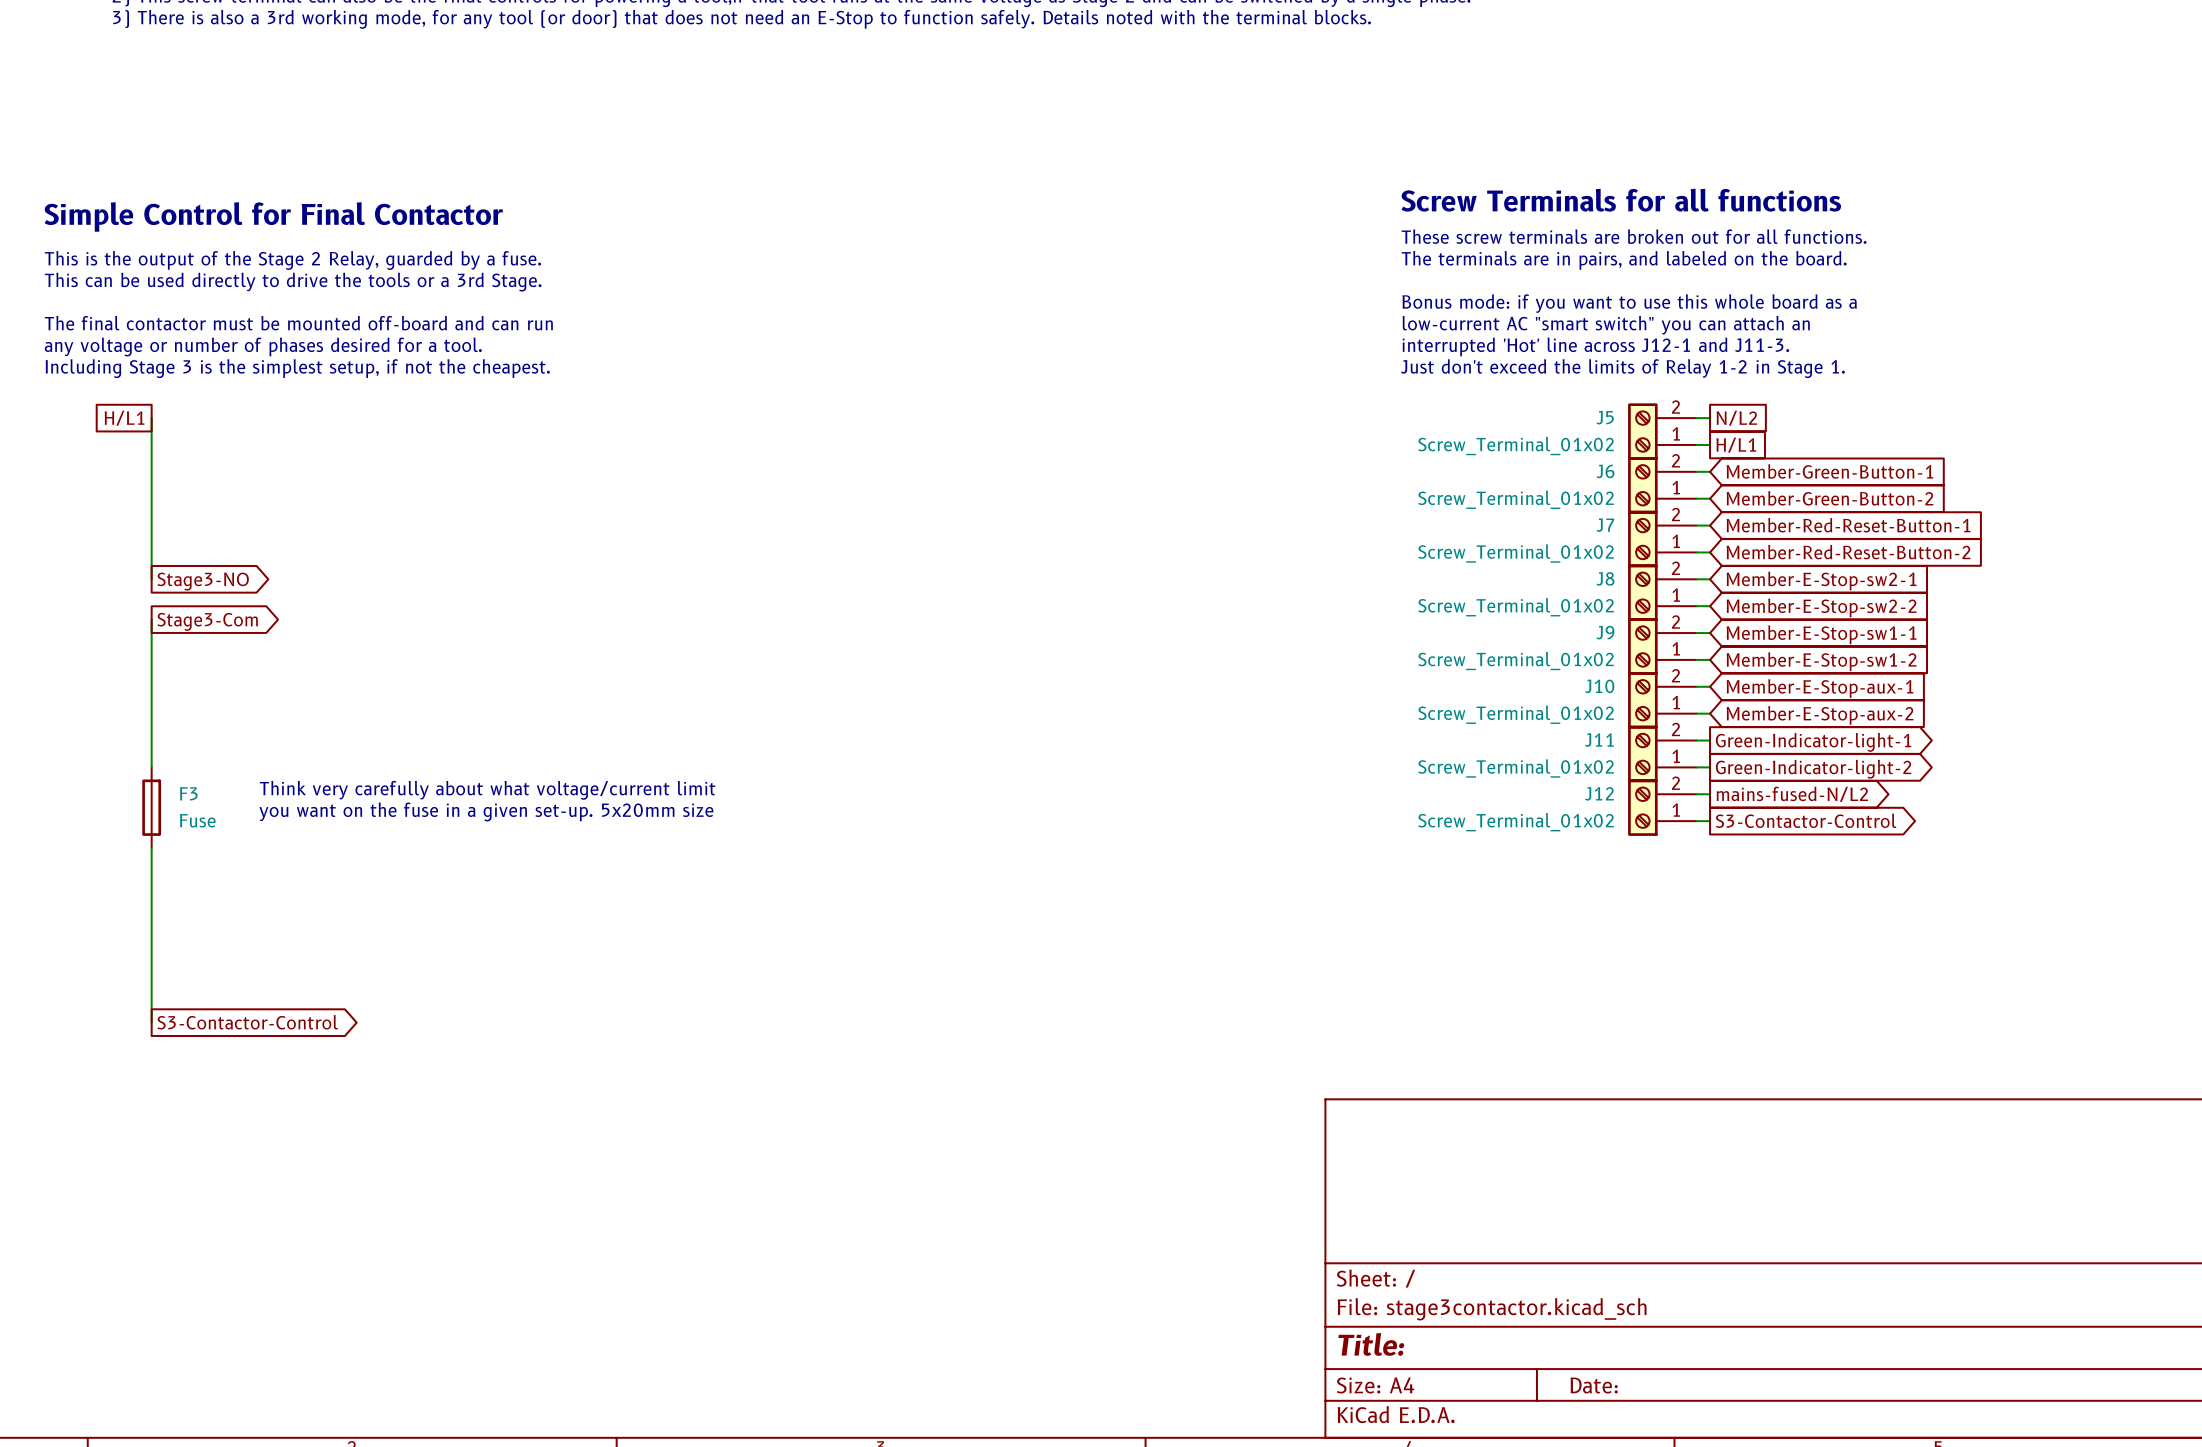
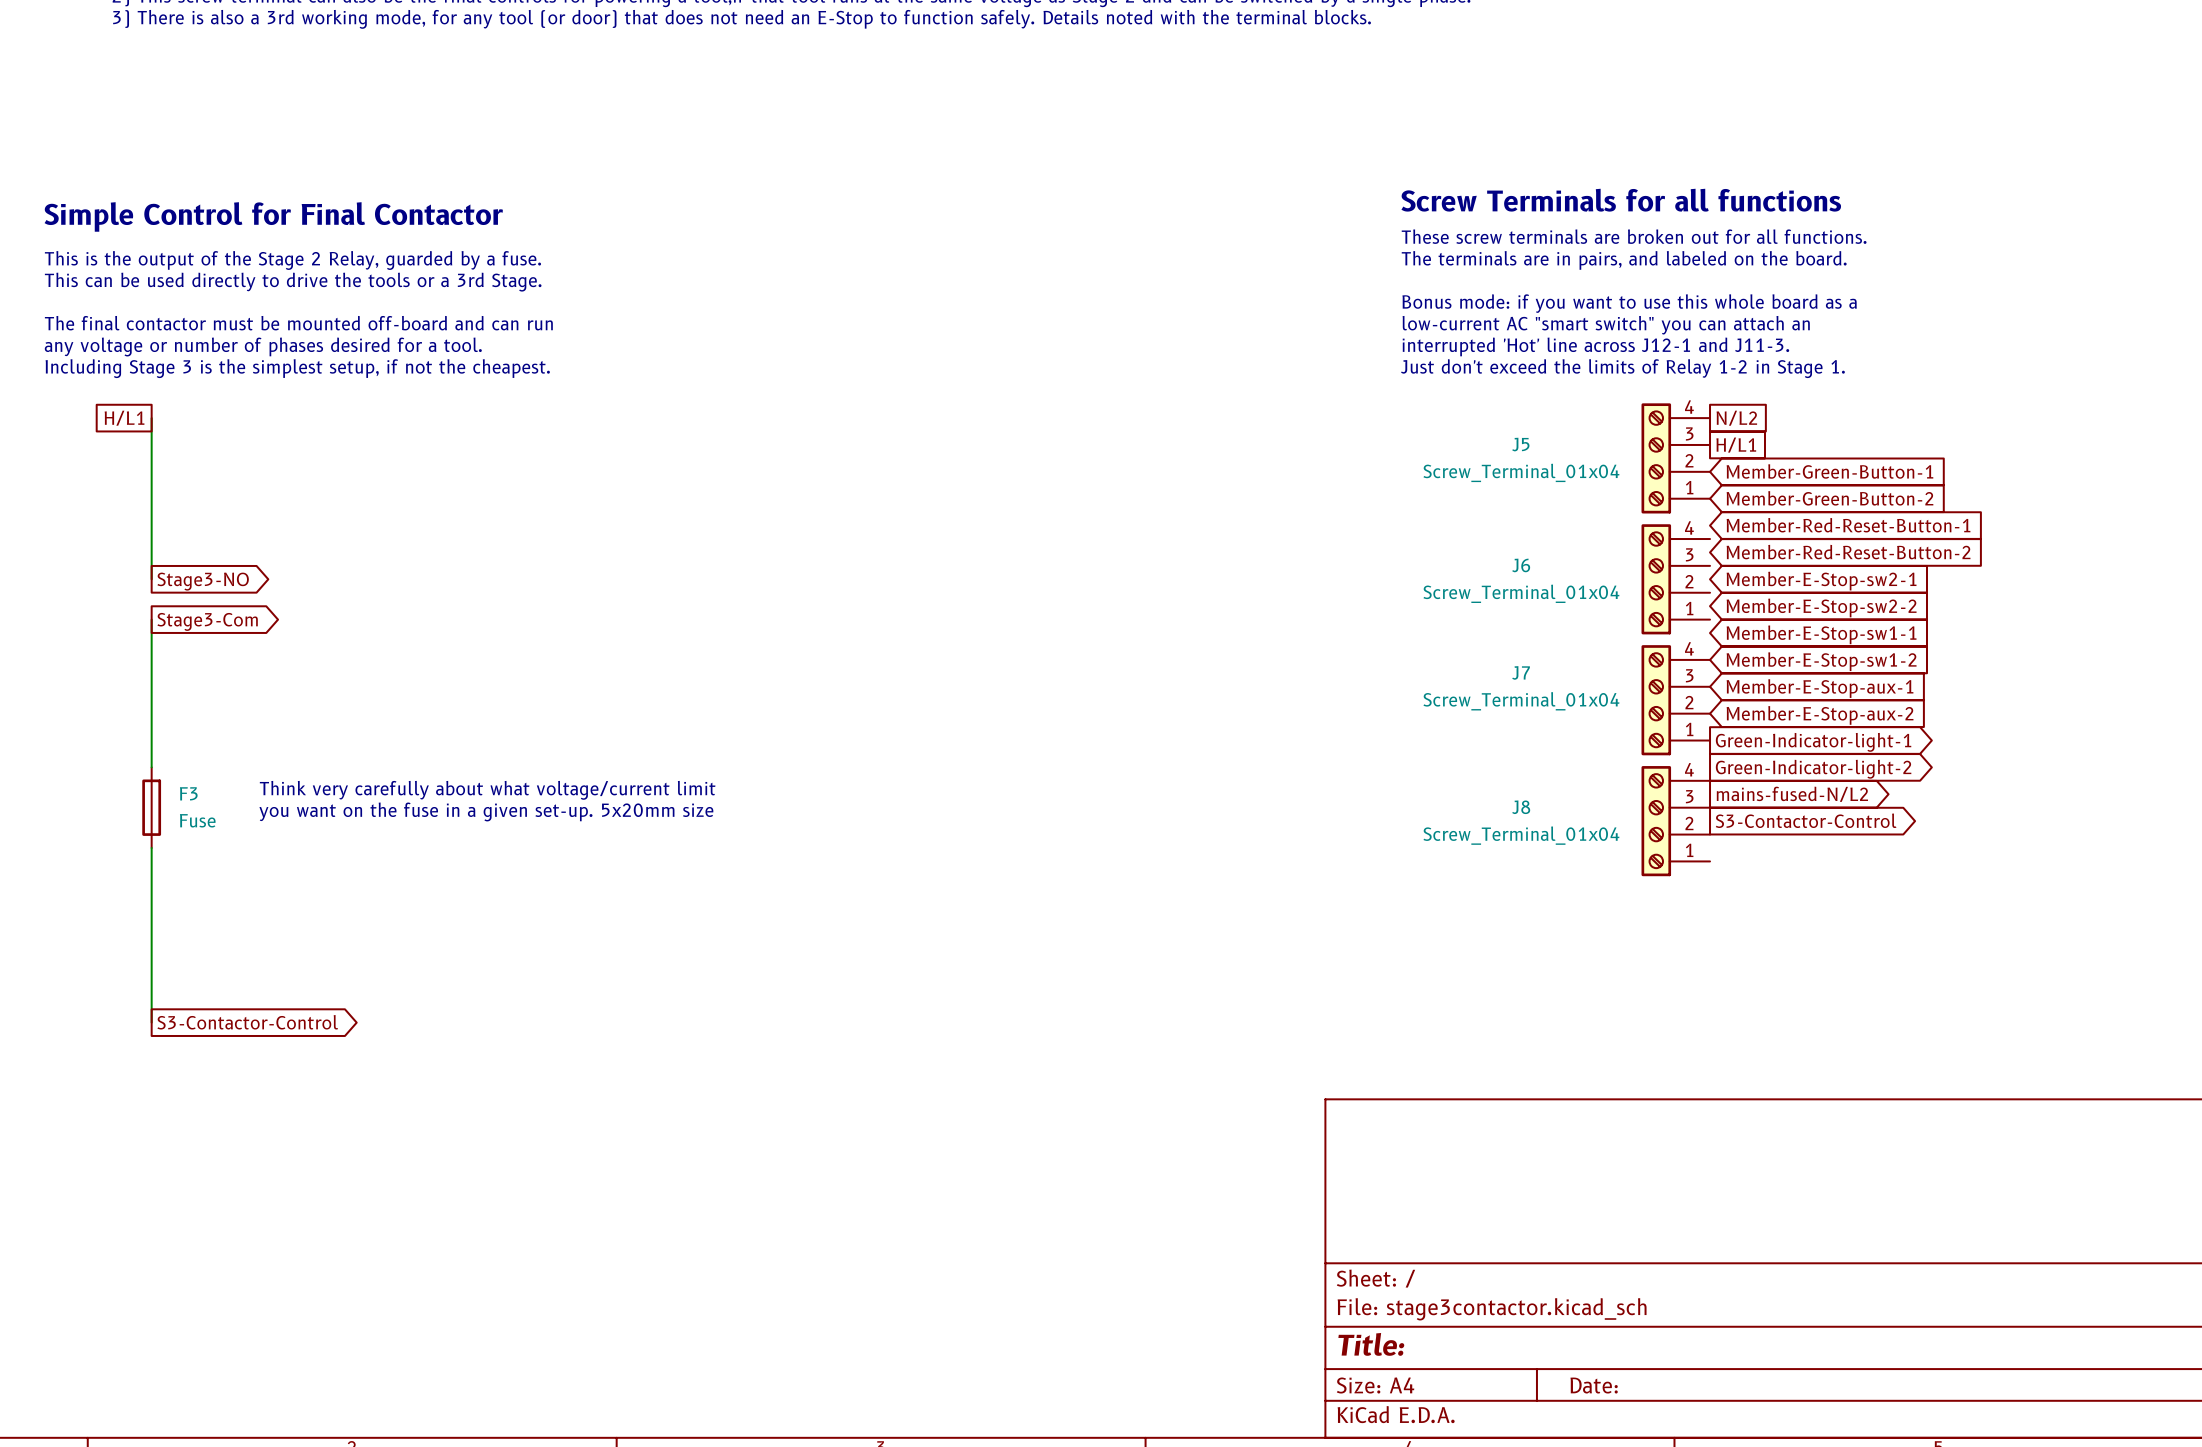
J5 symbol: [1628, 403, 1697, 460] -> [1641, 403, 1711, 514]
J5 name position: J5 (1605, 417) -> J5 (1520, 444)
J5 value: Screw_Terminal_01x02 (1516, 446) -> Screw_Terminal_01x04 (1521, 472)
J6 symbol: [1628, 457, 1697, 514] -> [1641, 524, 1711, 635]
J6 name position: J6 (1605, 471) -> J6 (1521, 565)
J6 value: Screw_Terminal_01x02 (1516, 499) -> Screw_Terminal_01x04 (1521, 593)
J7 symbol: [1628, 510, 1697, 568] -> [1641, 645, 1711, 756]
J7 name position: J7 (1605, 525) -> J7 (1521, 672)
wire: (1696, 525) (1710, 525) -> none
wire: (1696, 552) (1710, 552) -> none
J7 value: Screw_Terminal_01x02 (1516, 553) -> Screw_Terminal_01x04 (1521, 701)
J8 symbol: [1628, 564, 1697, 621] -> [1641, 766, 1711, 877]
J8 name position: J8 (1605, 578) -> J8 (1521, 807)
wire: (1696, 579) (1710, 579) -> none
wire: (1696, 606) (1710, 606) -> none
J8 value: Screw_Terminal_01x02 (1516, 607) -> Screw_Terminal_01x04 (1521, 835)
wire: (1696, 633) (1710, 633) -> none
J9: Screw_Terminal_01x02 (1662, 646) -> none
J10: Screw_Terminal_01x02 (1662, 700) -> none
J11: Screw_Terminal_01x02 (1662, 753) -> none
wire: (1696, 767) (1710, 767) -> none
wire: (1696, 794) (1710, 794) -> none
J12: Screw_Terminal_01x02 (1662, 807) -> none
wire: (1696, 821) (1710, 821) -> none

